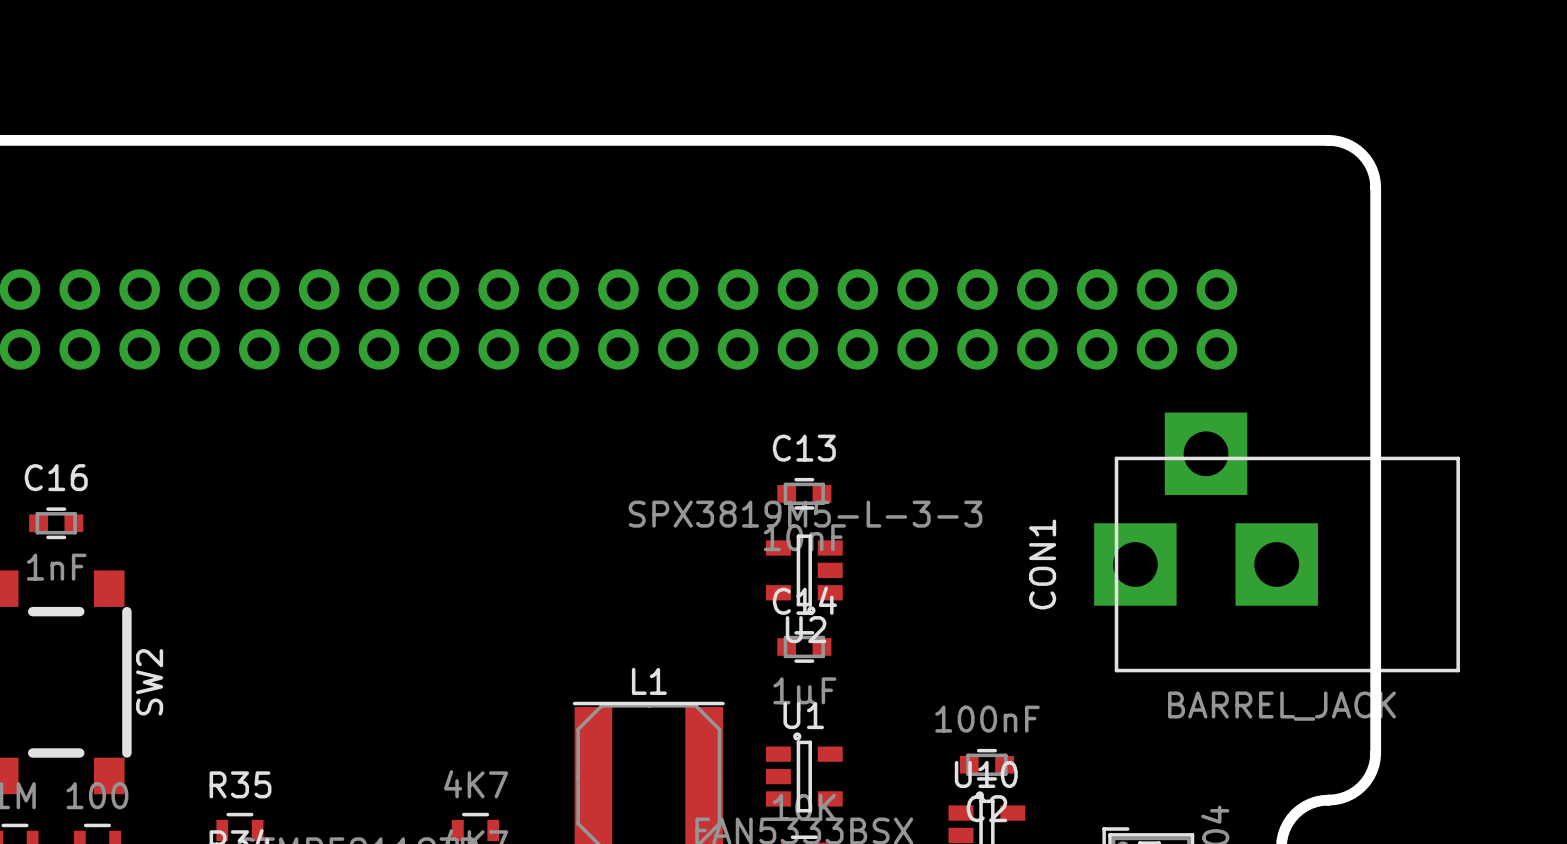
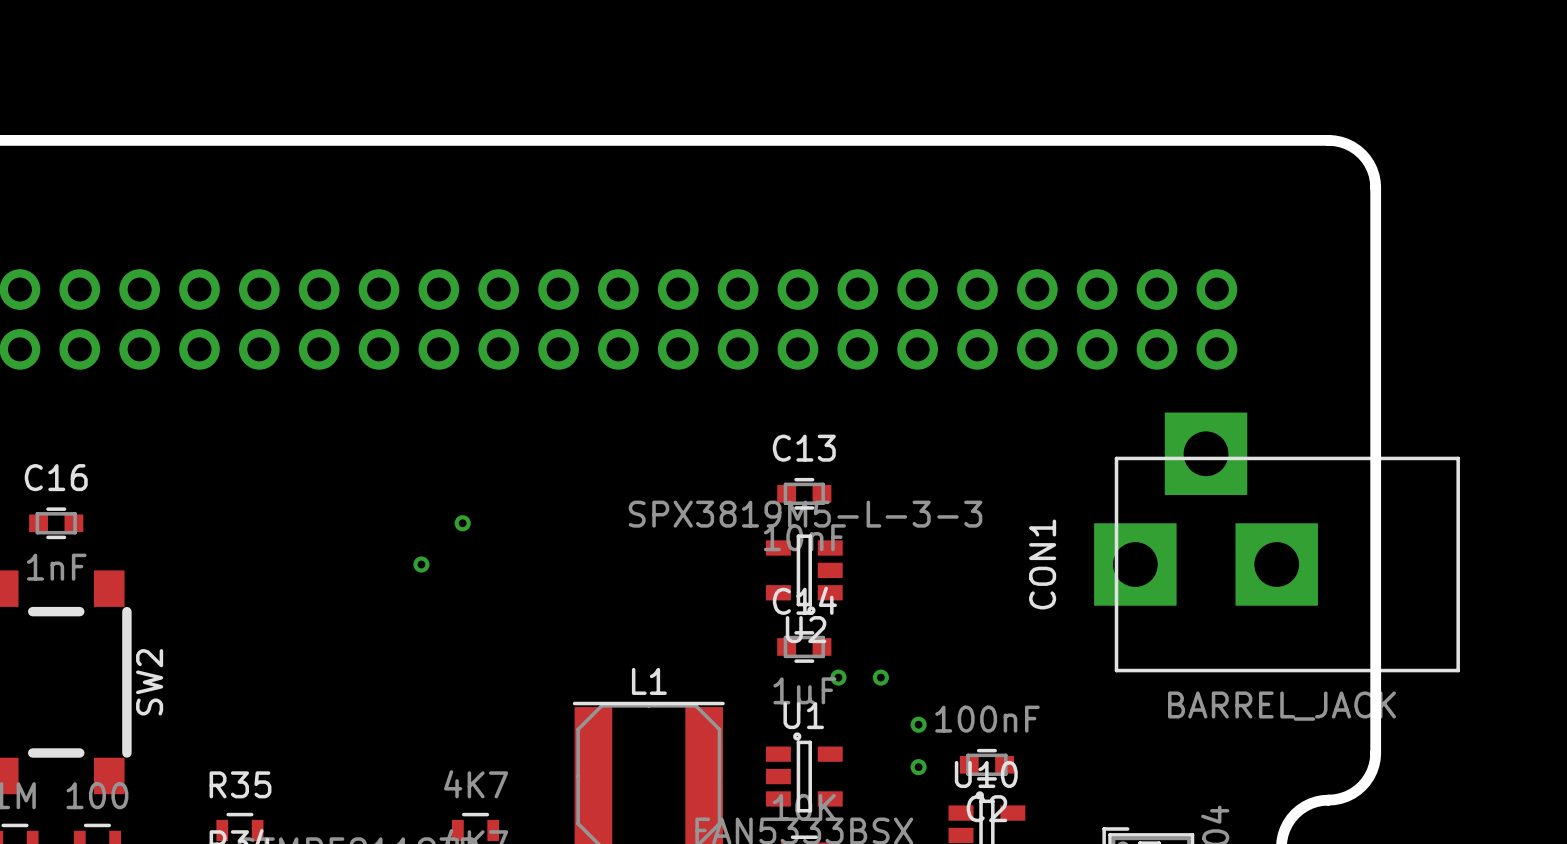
part: none -> (462, 523)
part: none -> (421, 564)
part: none -> (838, 677)
part: none -> (880, 677)
part: none -> (918, 724)
part: none -> (918, 767)

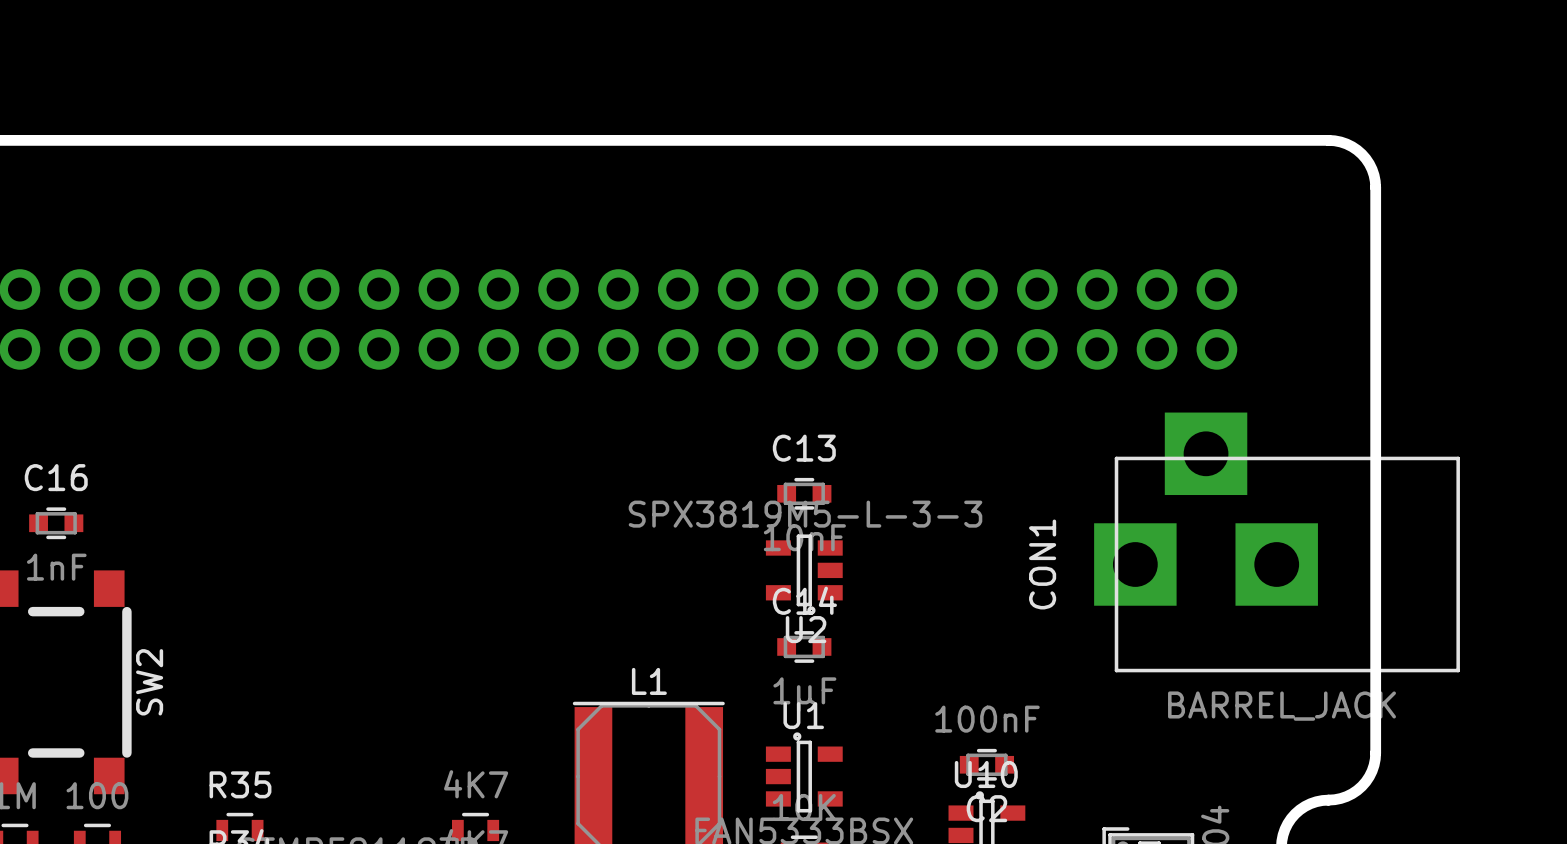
part: (462, 523) -> none
part: (421, 564) -> none
part: (838, 677) -> none
part: (880, 677) -> none
part: (918, 724) -> none
part: (918, 767) -> none

